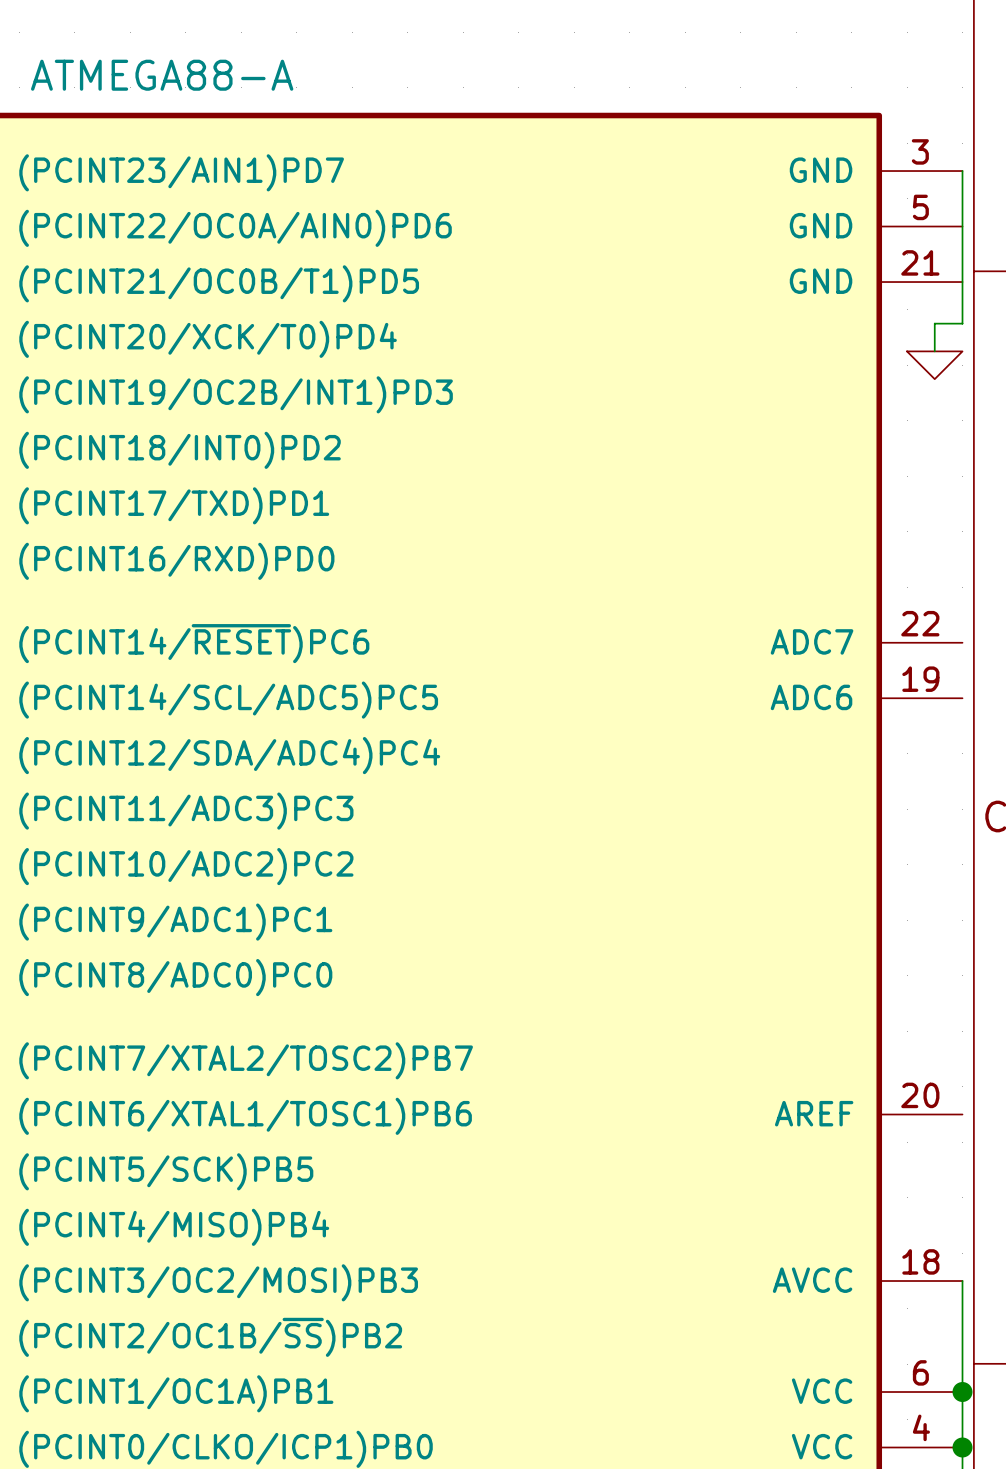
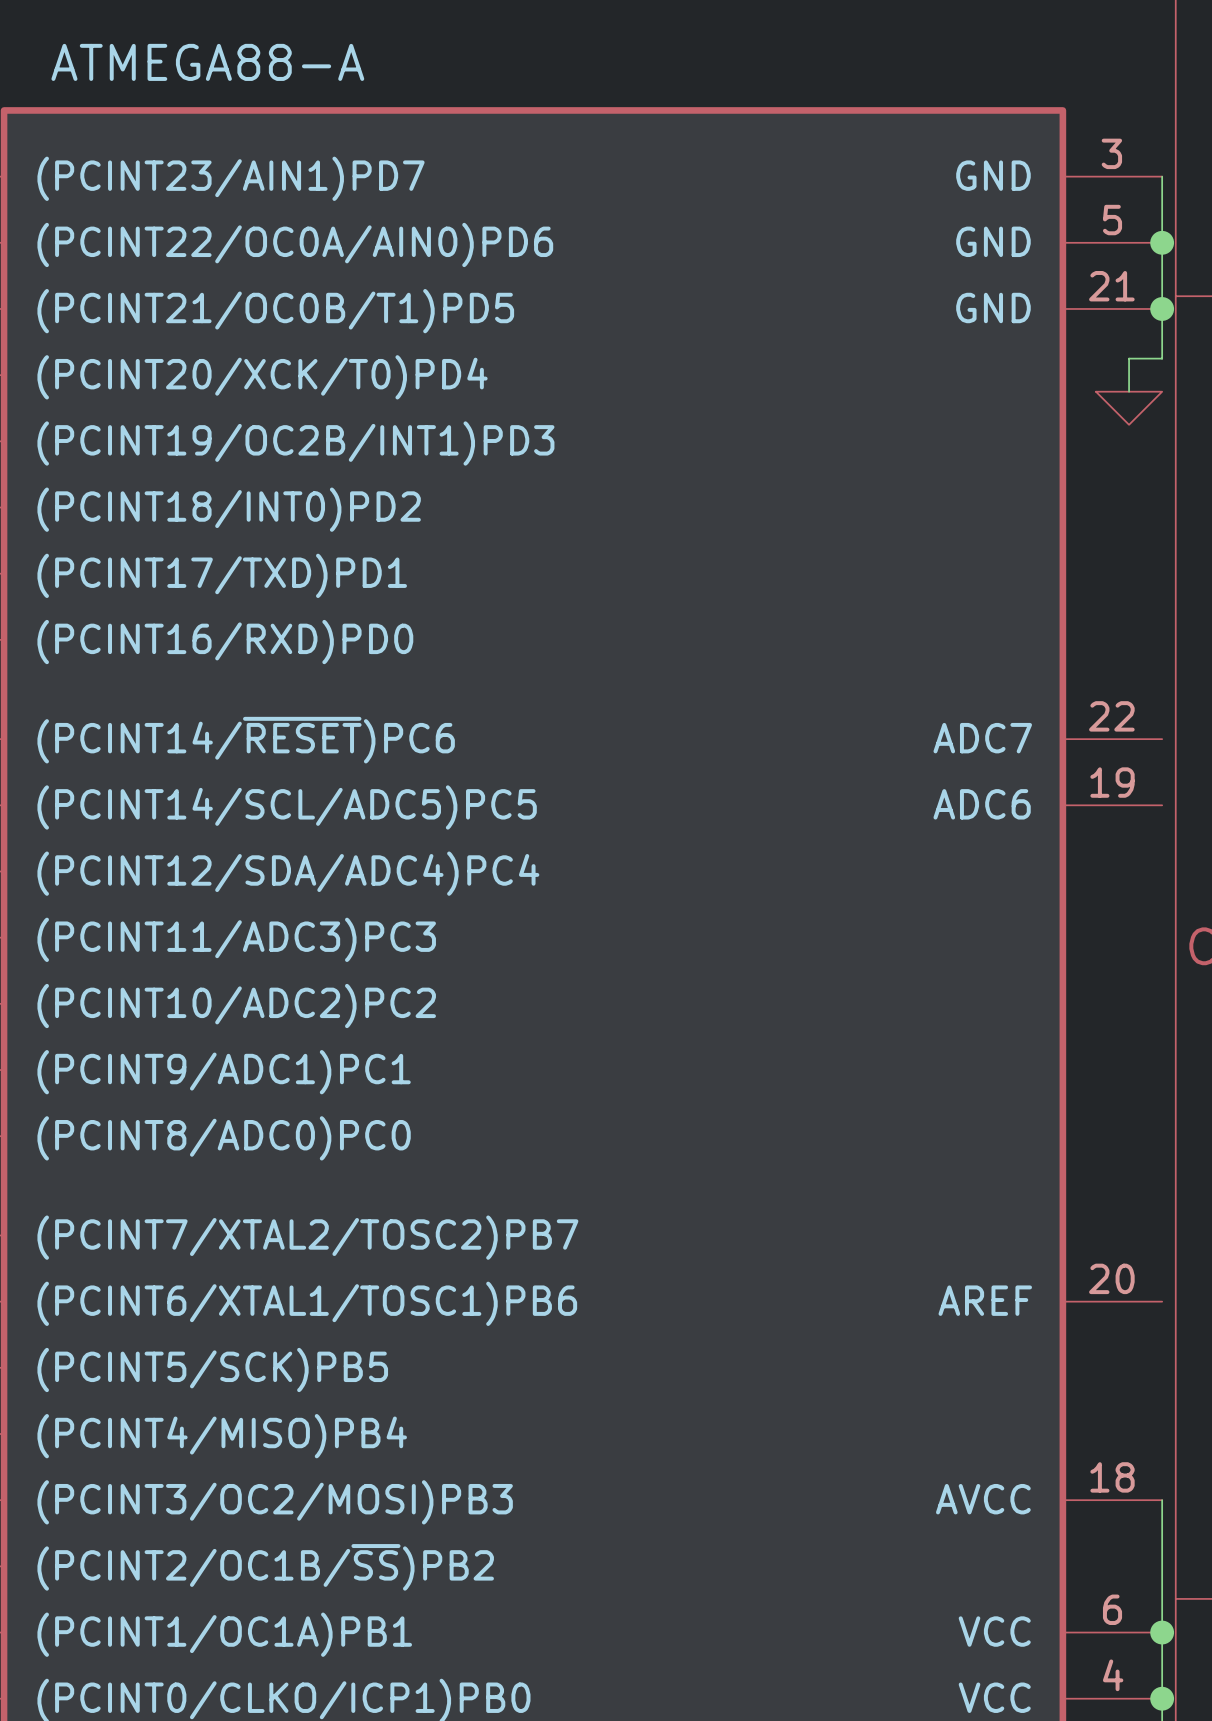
junction: none -> (1162, 242)
junction: none -> (1162, 308)

